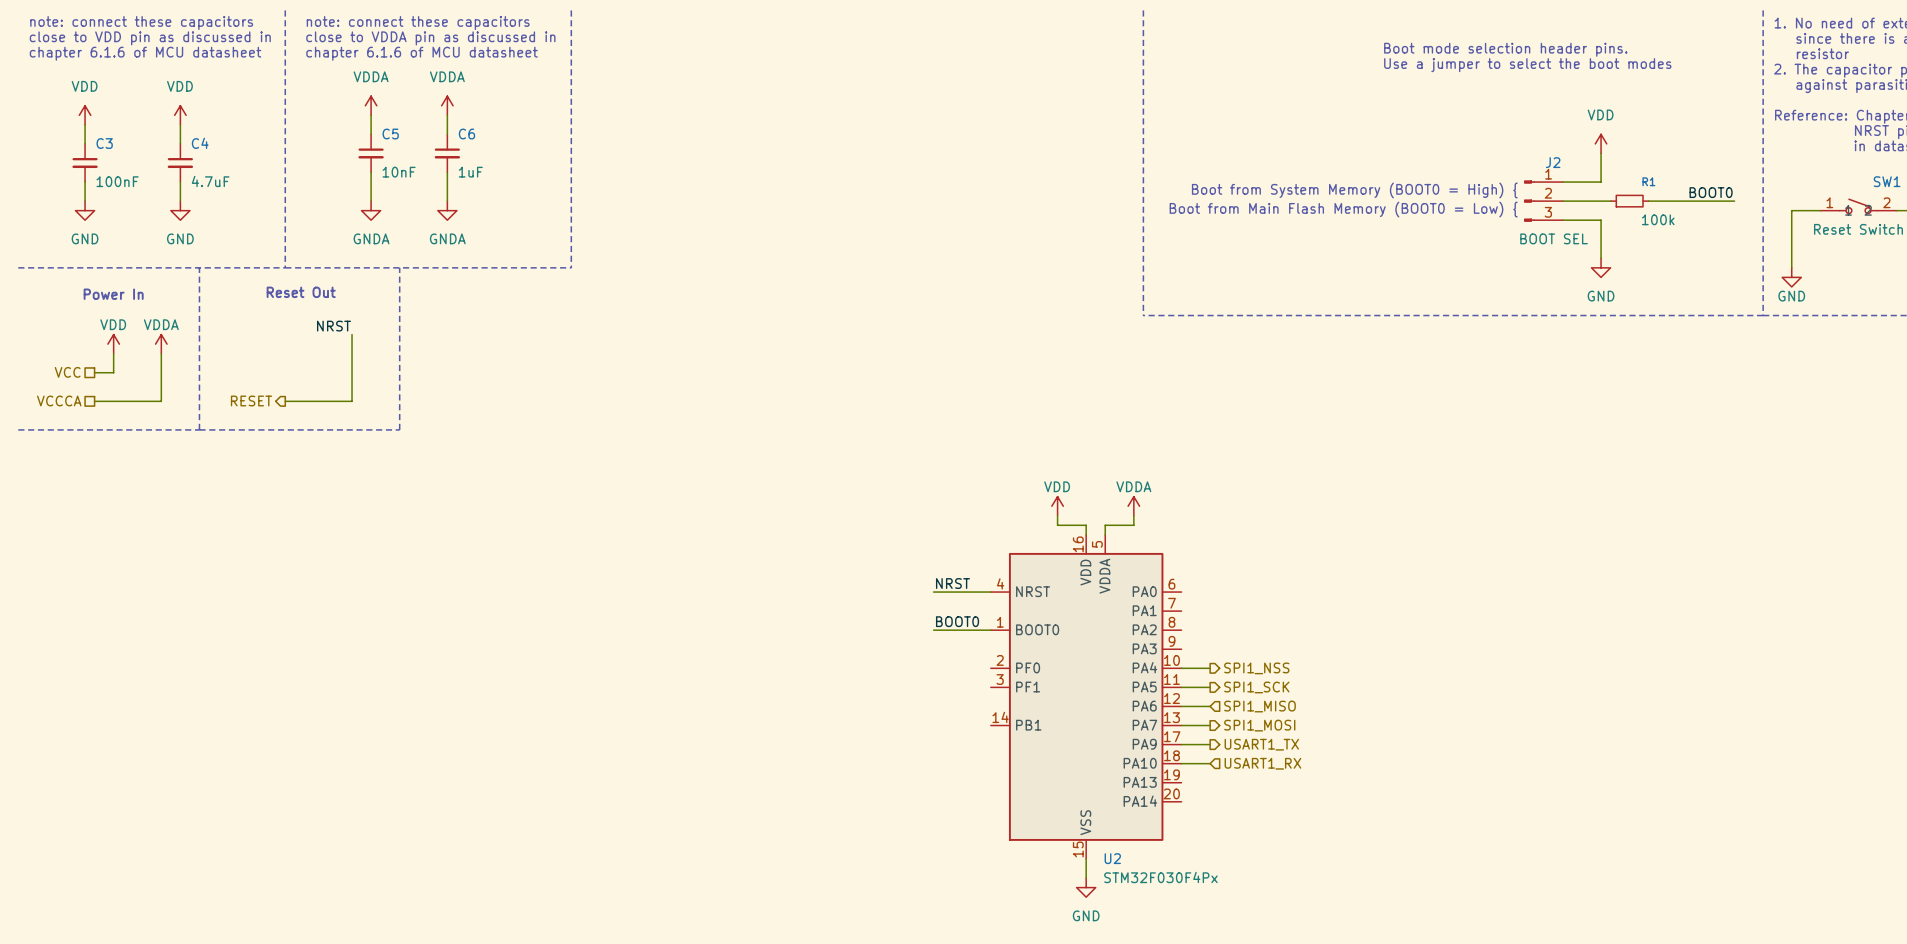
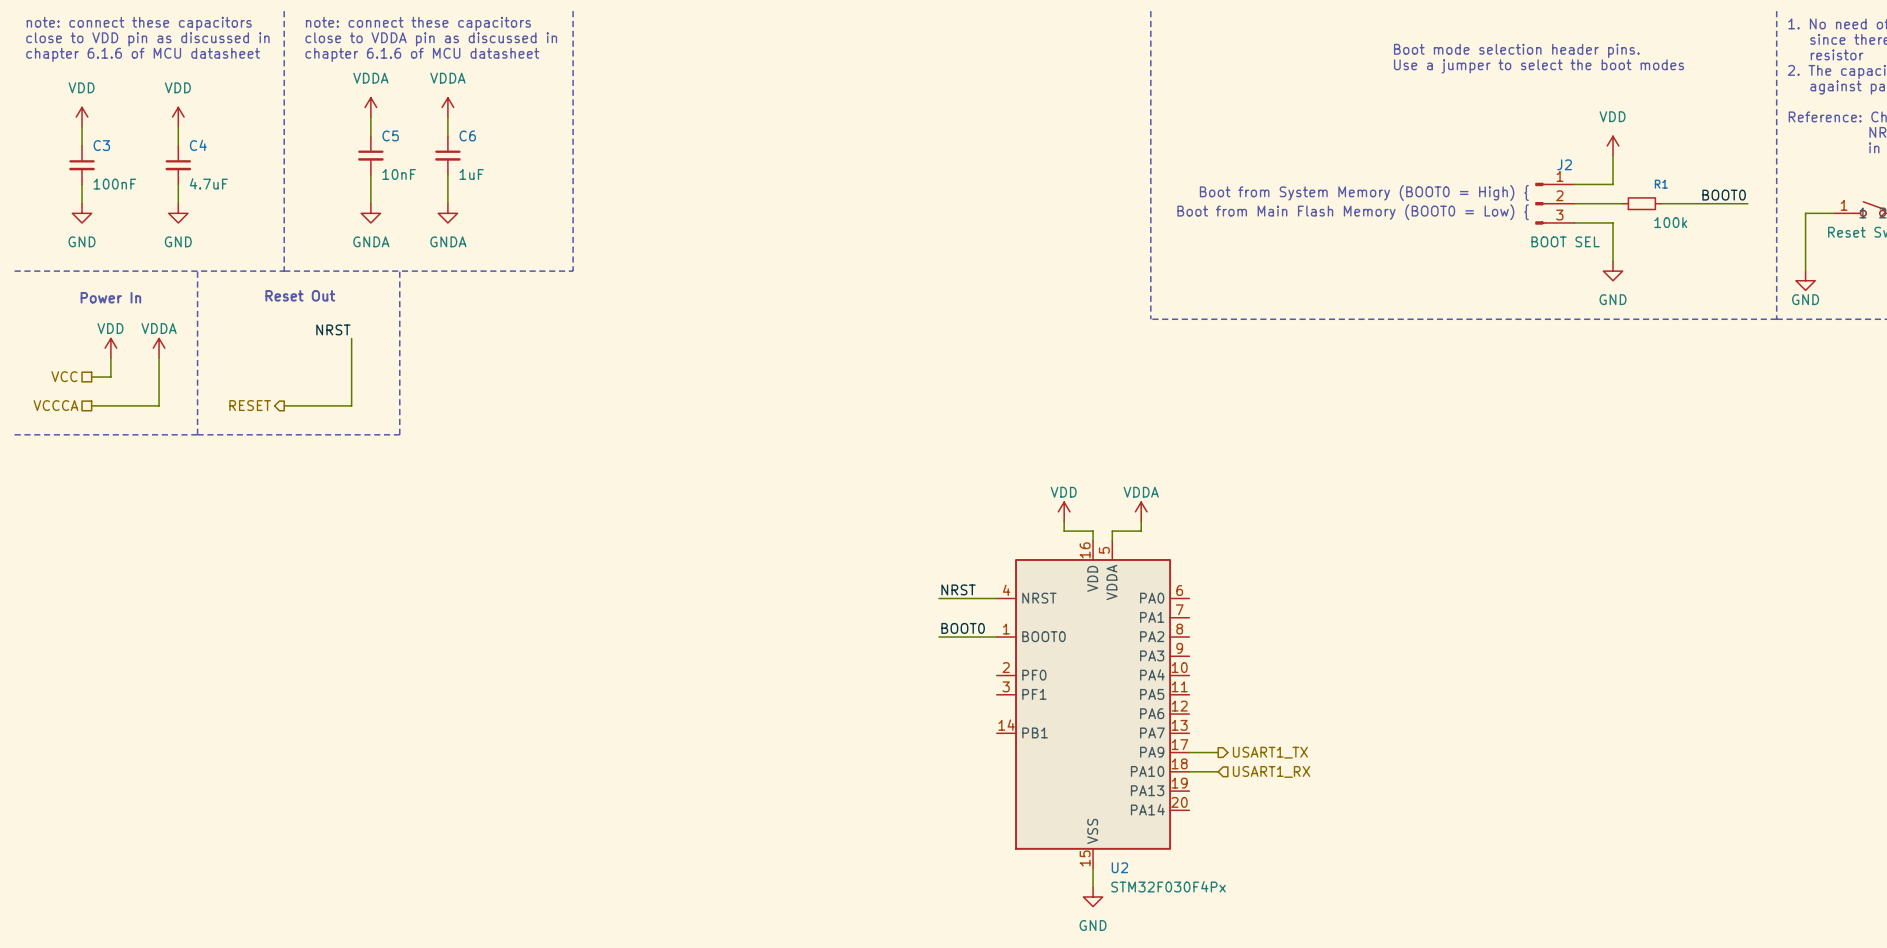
wire: (1181, 668) (1210, 668) -> none
hierarchical label: SPI1_NSS (1256, 668) -> none
wire: (1181, 687) (1210, 687) -> none
hierarchical label: SPI1_SCK (1256, 687) -> none
wire: (1181, 706) (1210, 706) -> none
hierarchical label: SPI1_MISO (1259, 706) -> none
wire: (1181, 725) (1210, 725) -> none
hierarchical label: SPI1_MOSI (1259, 725) -> none

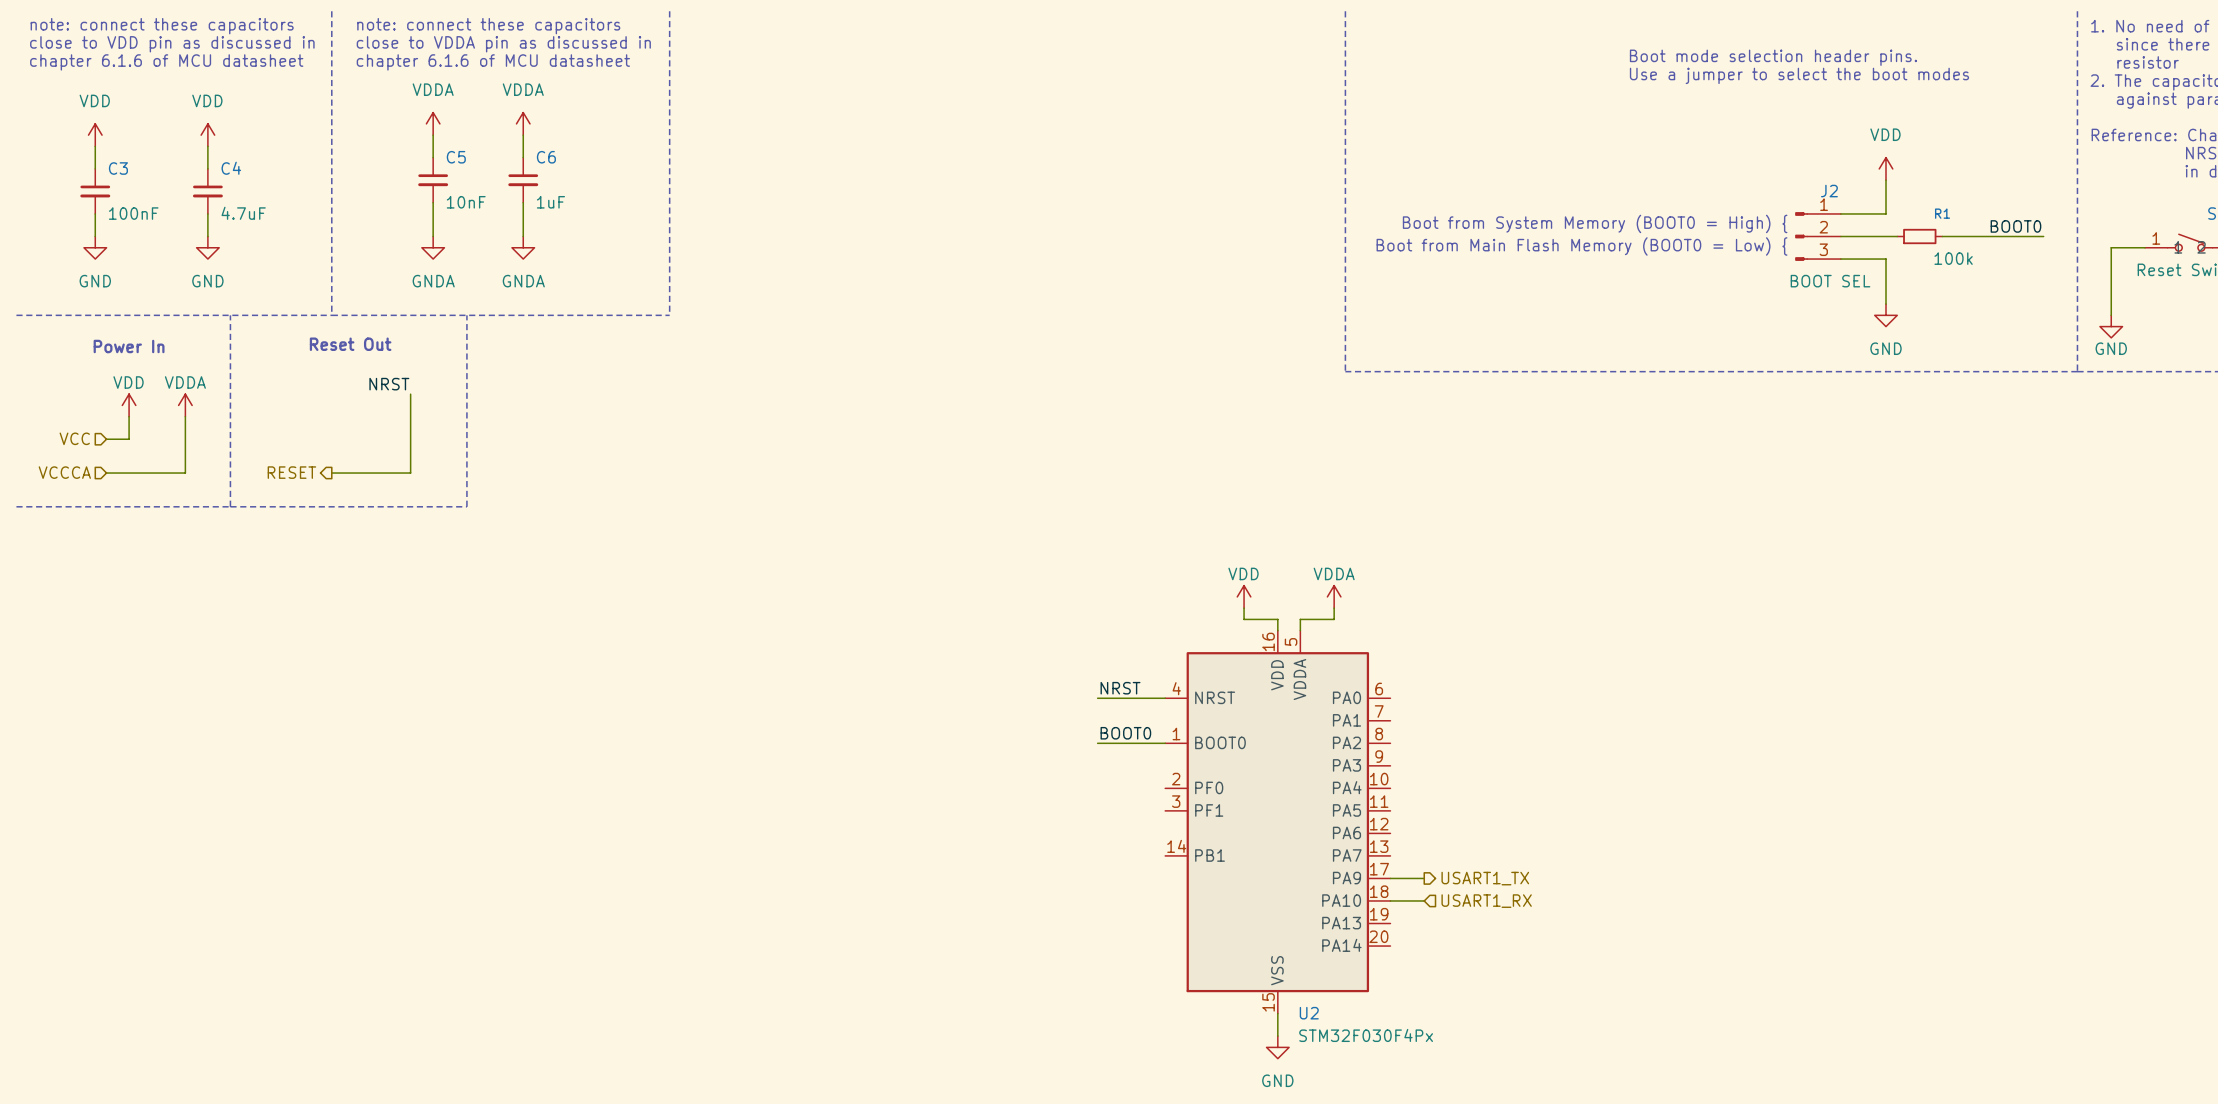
hierarchical label shape: passive (64, 376) -> input (74, 438)
hierarchical label shape: passive (55, 405) -> input (64, 472)

